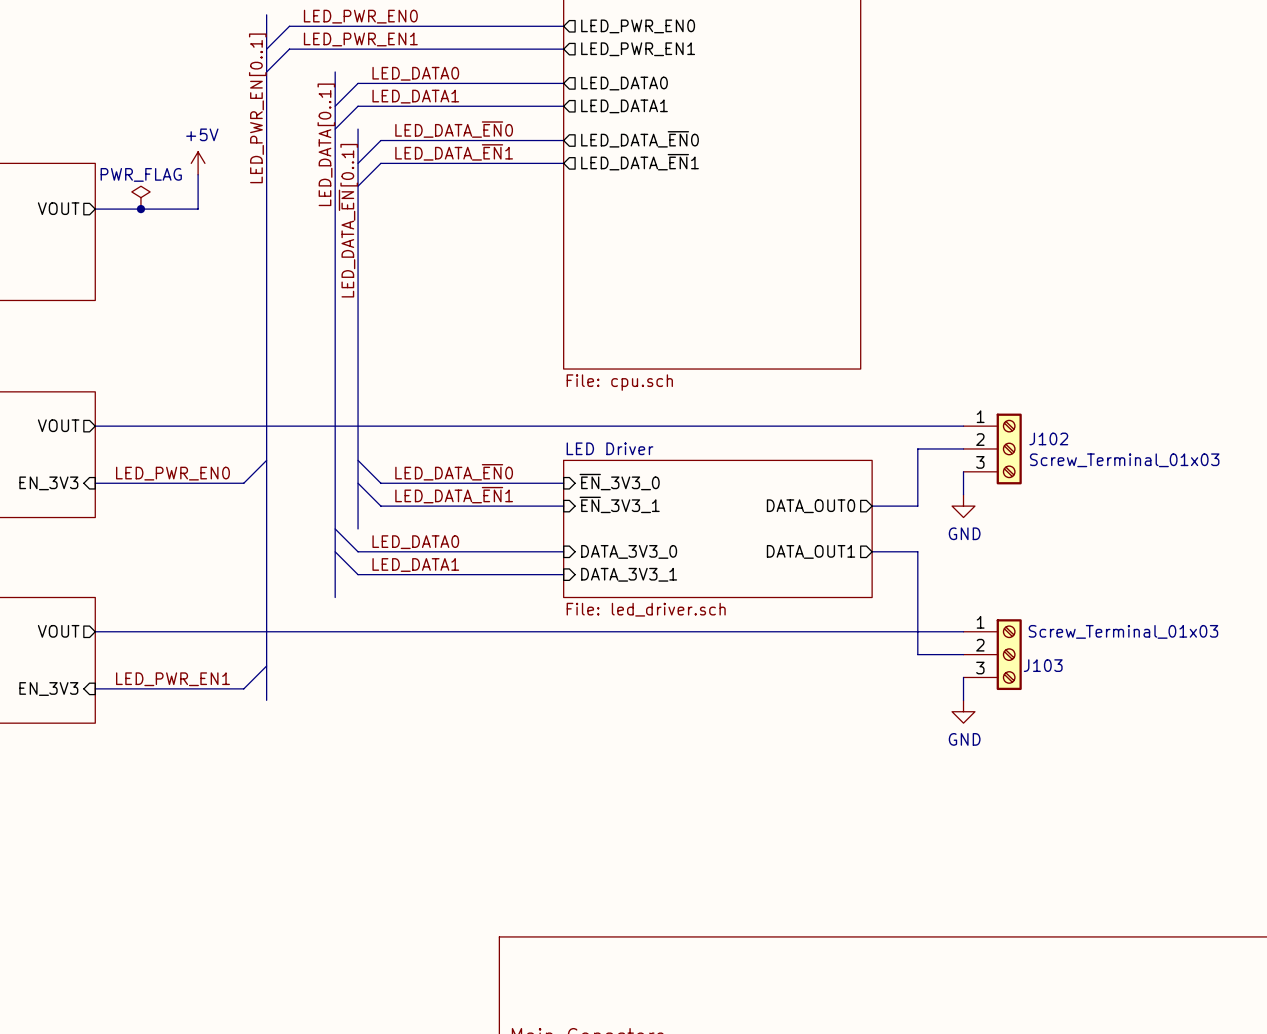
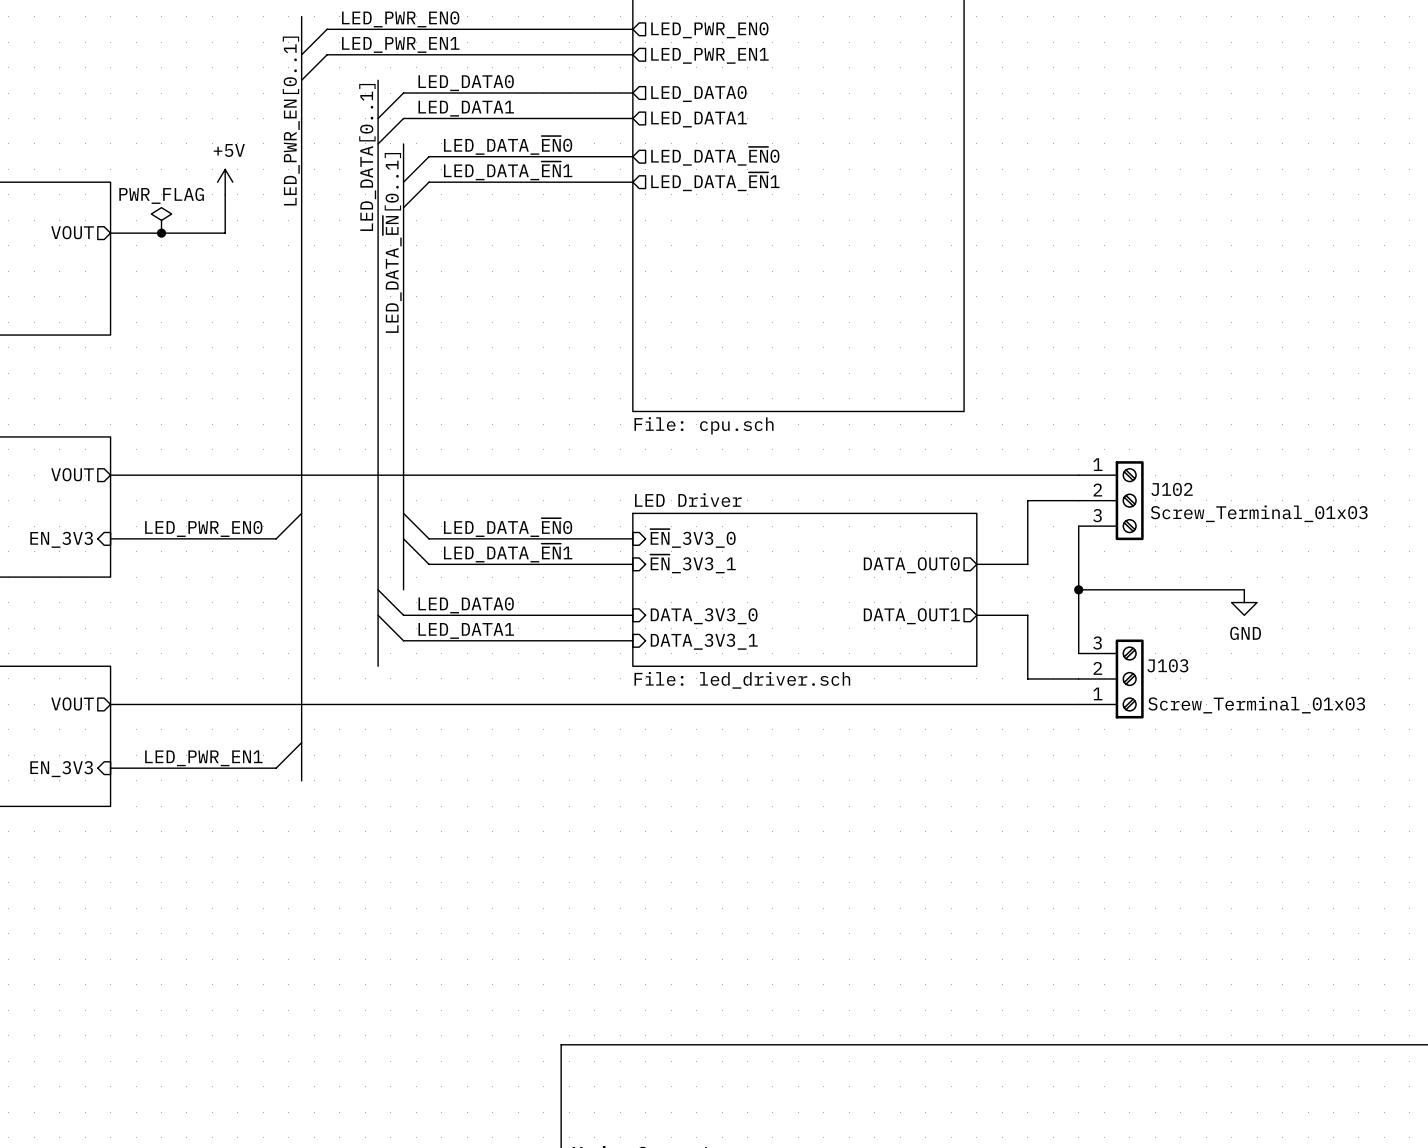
wire: none -> (1078, 551) (1078, 653)
power symbol: GND (963, 506) -> none
wire: none -> (1078, 589) (1244, 589)
junction: none -> (1078, 589)
power symbol: none -> GND (1244, 602)
wire: (917, 608) (917, 654) (963, 654) -> (1027, 678) (1078, 678)
J103 position: (992, 654) -> (1111, 678)
J103 flip: as is (1009, 654) -> up-down (1129, 678)
wire: (963, 677) (963, 700) -> none
power symbol: GND (963, 711) -> none

